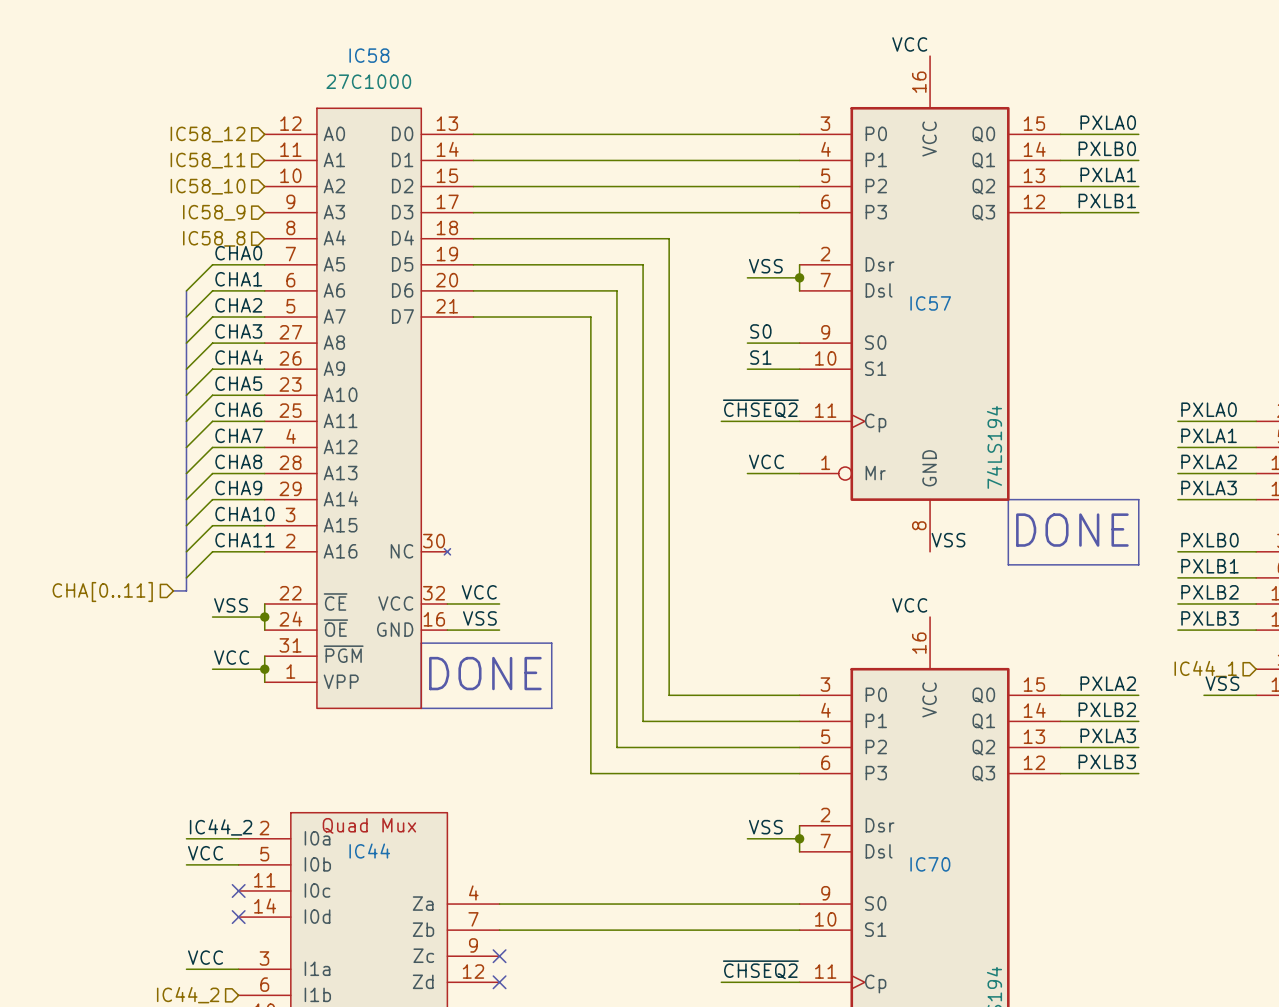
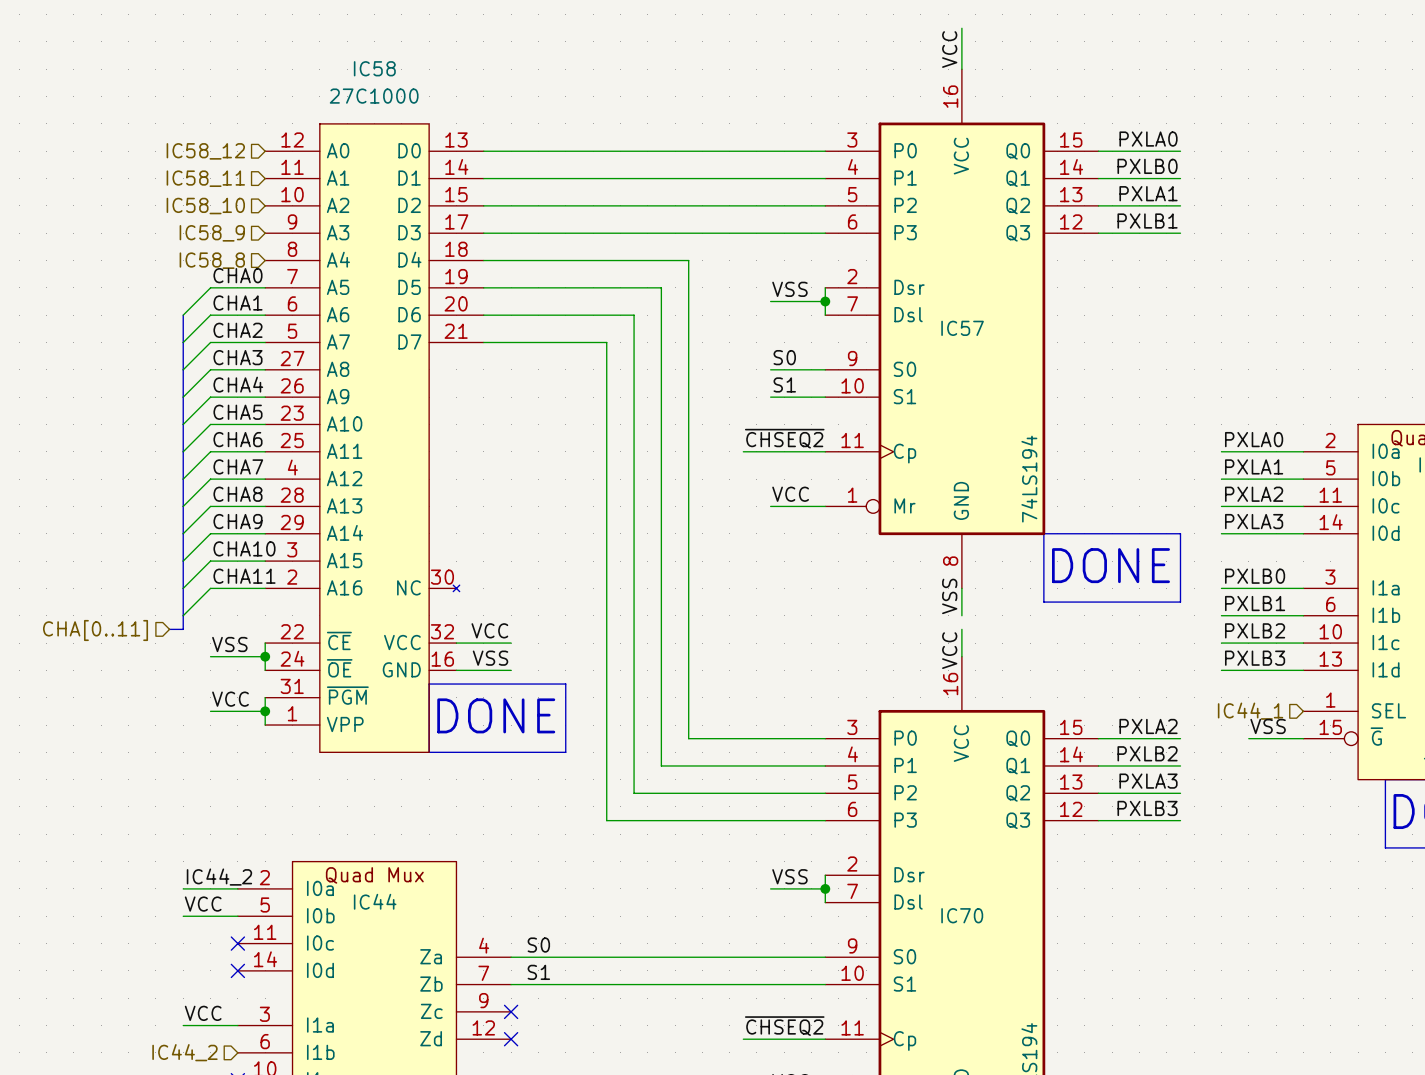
wire: none -> (961, 28) (961, 69)
label rotation: 0° (909, 44) -> 90° counterclockwise (949, 49)
label rotation: 0° (948, 540) -> 90° counterclockwise (949, 596)
wire: none -> (961, 588) (961, 615)
wire: none -> (961, 629) (961, 656)
label rotation: 0° (909, 605) -> 90° counterclockwise (949, 650)
label: none -> S0 (538, 945)
label: none -> S1 (538, 972)

